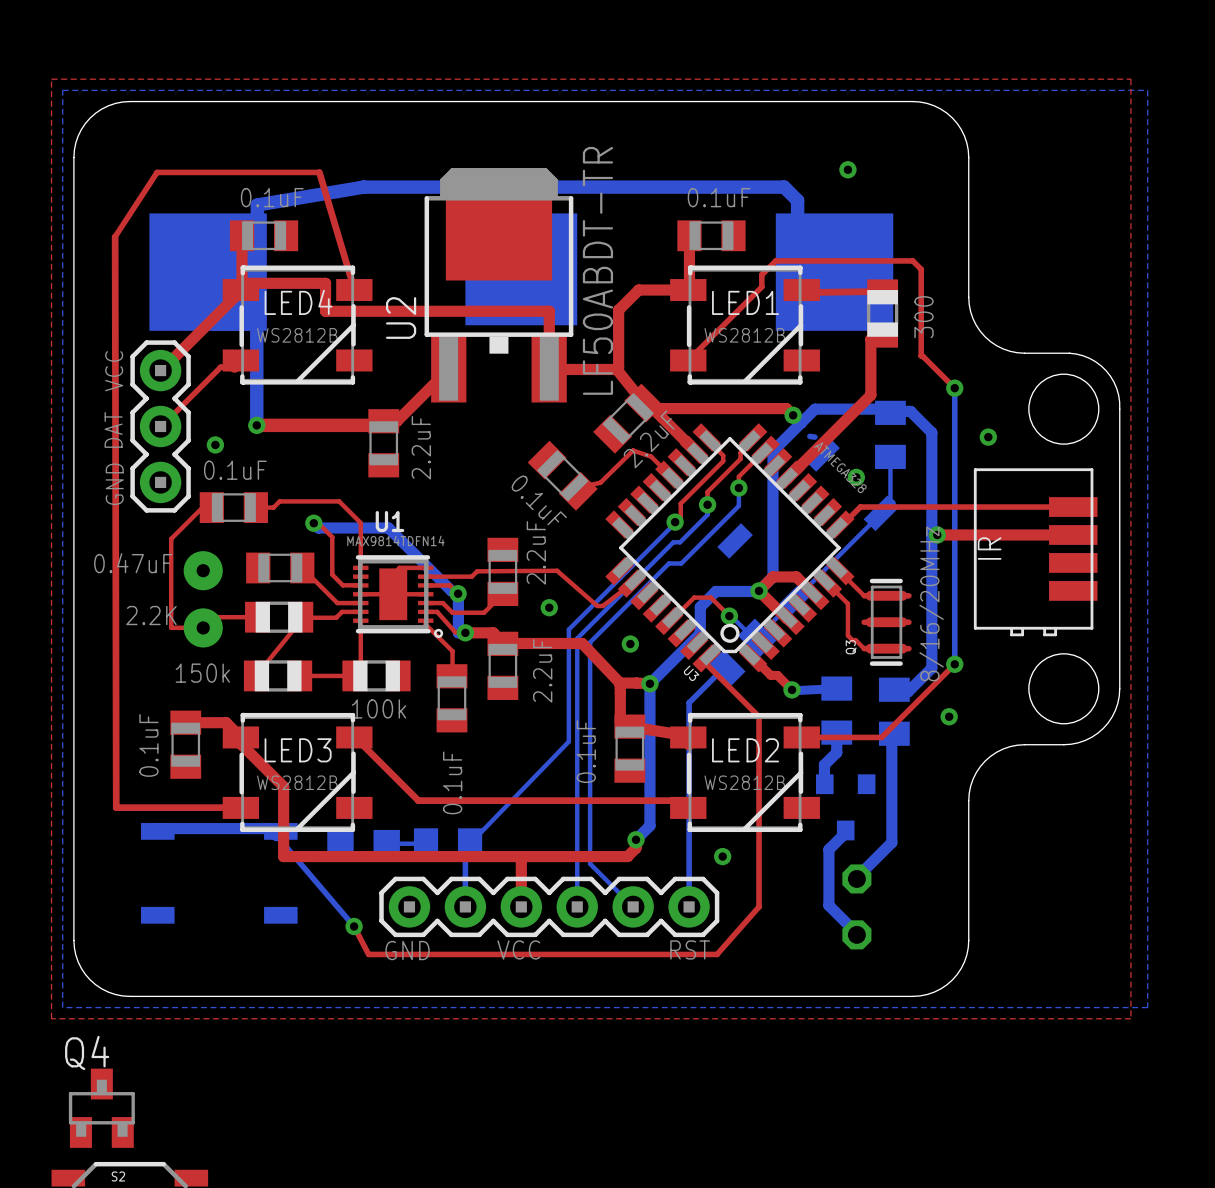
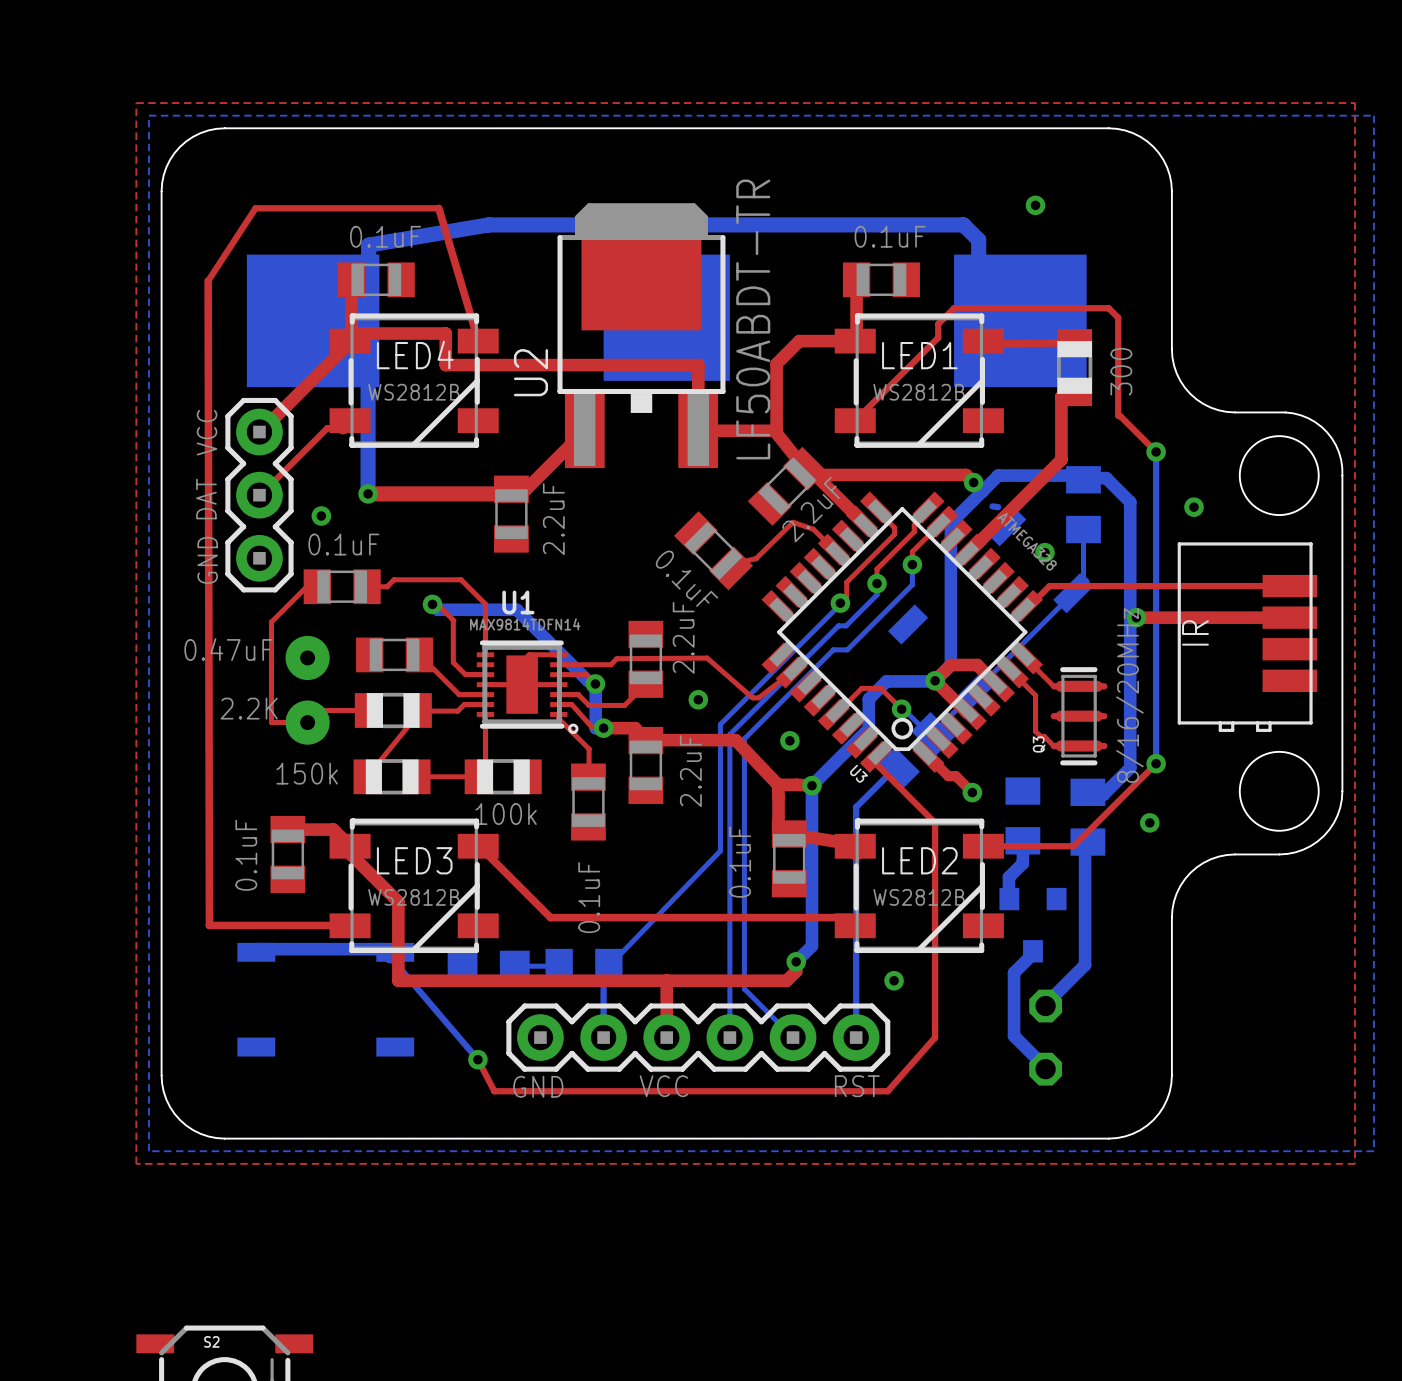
bottom track: (836, 688) (792, 690) -> none
Q4: (101, 1108) -> none

